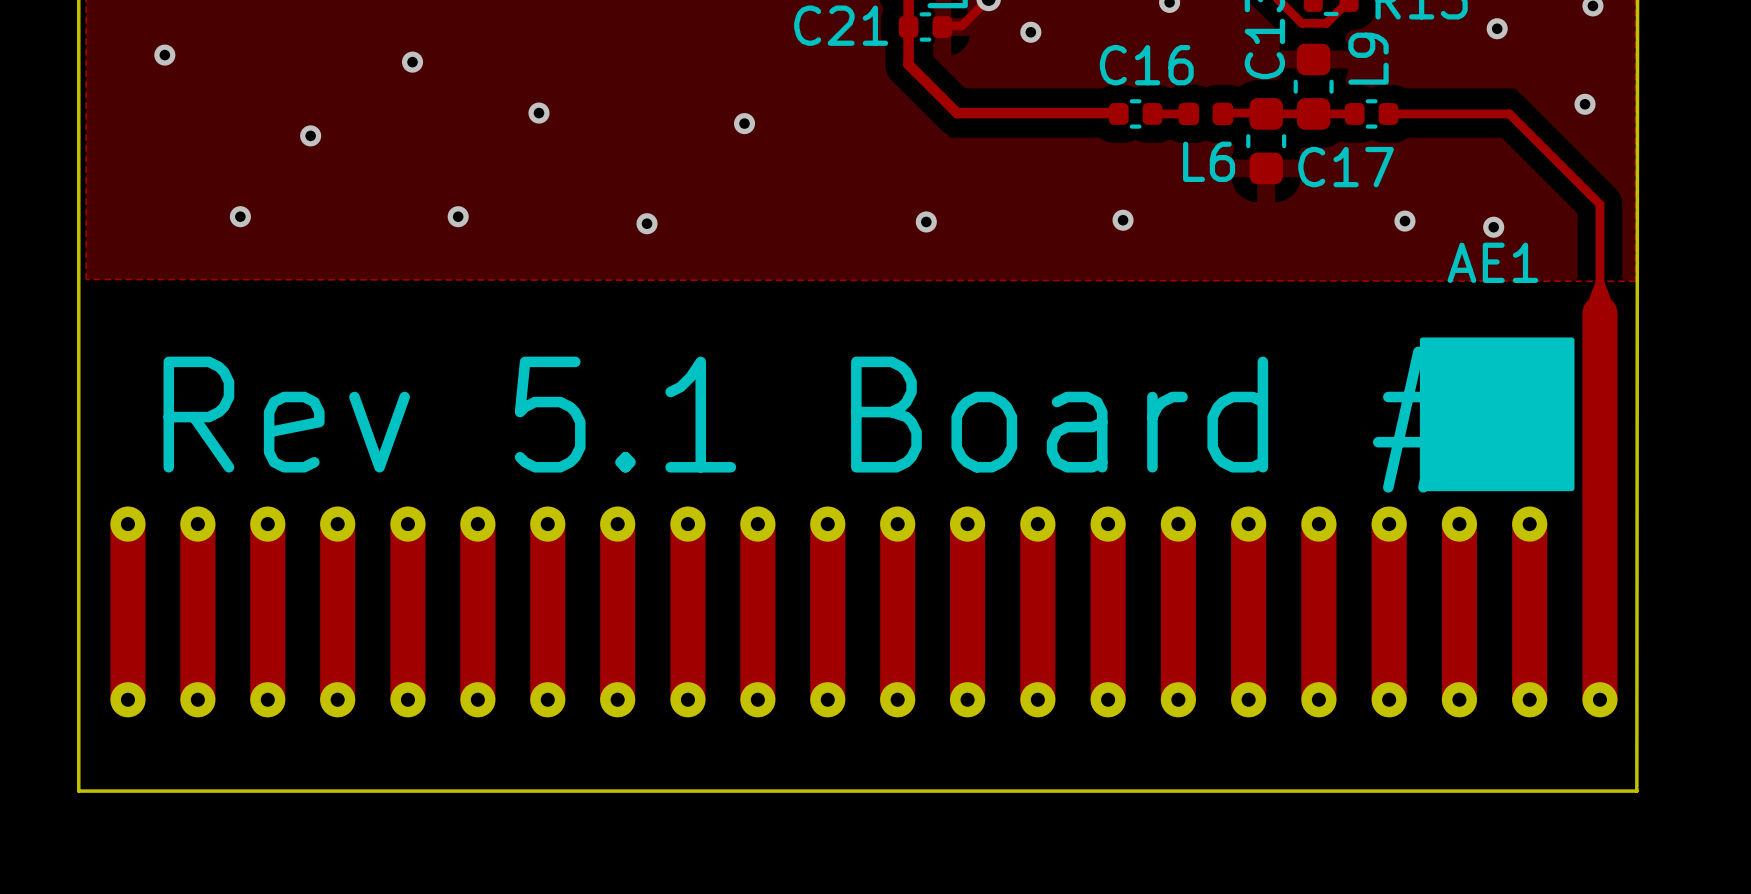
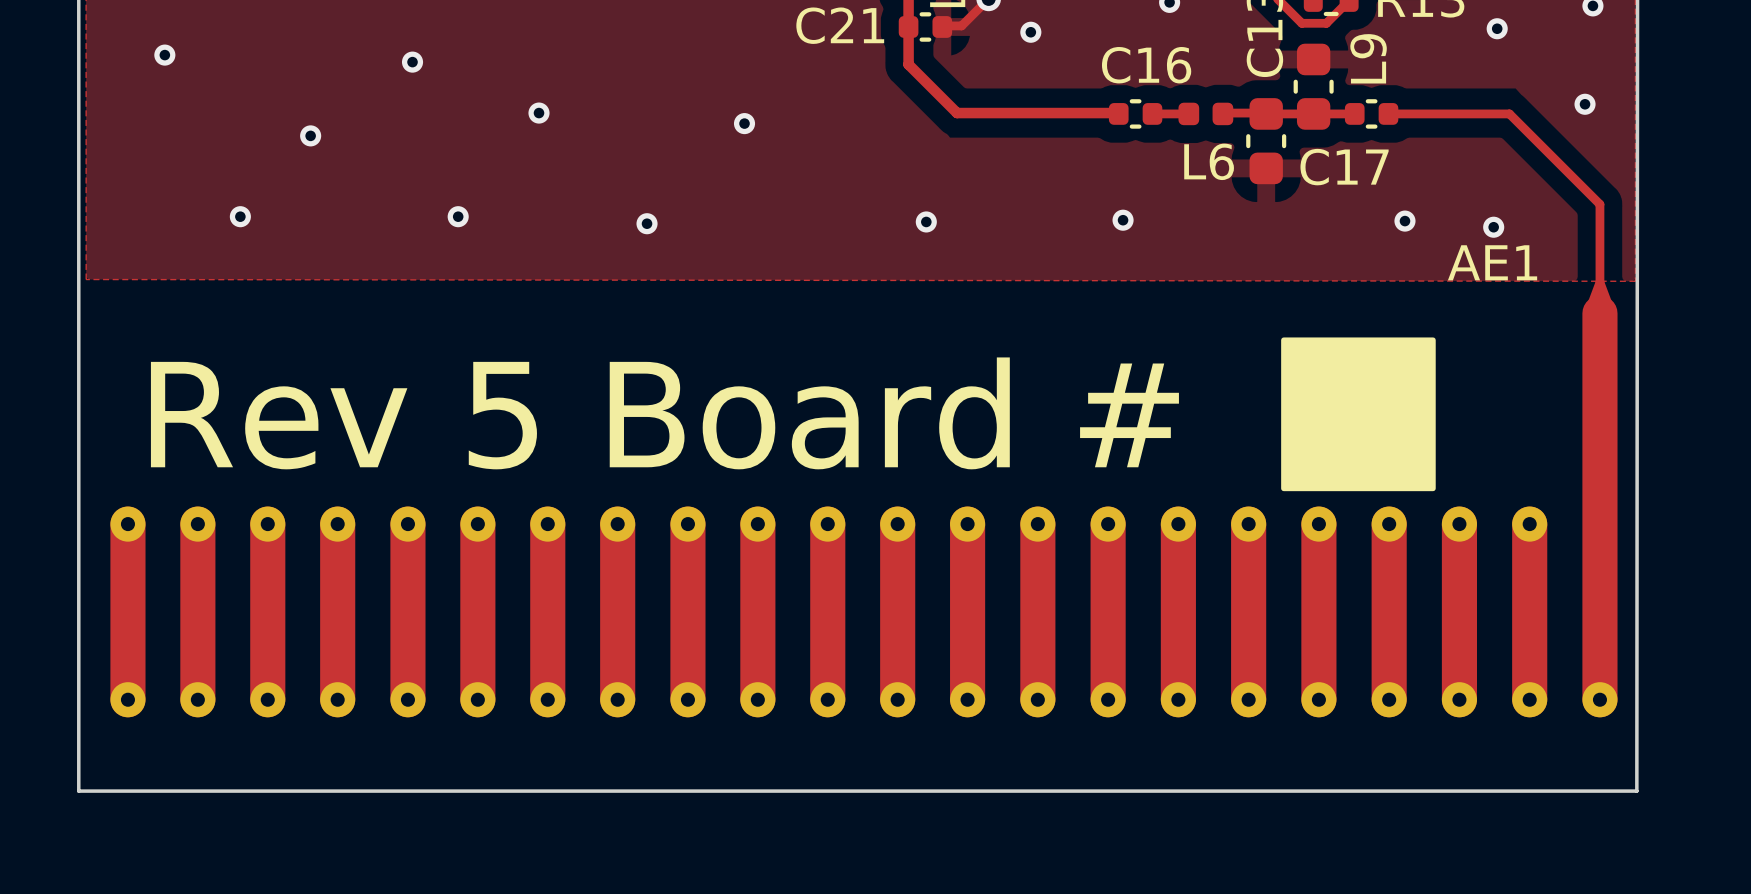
drawing position: (1497, 414) -> (1358, 414)
text: Rev 5.1 Board # (816, 419) -> Rev 5 Board # (664, 413)

